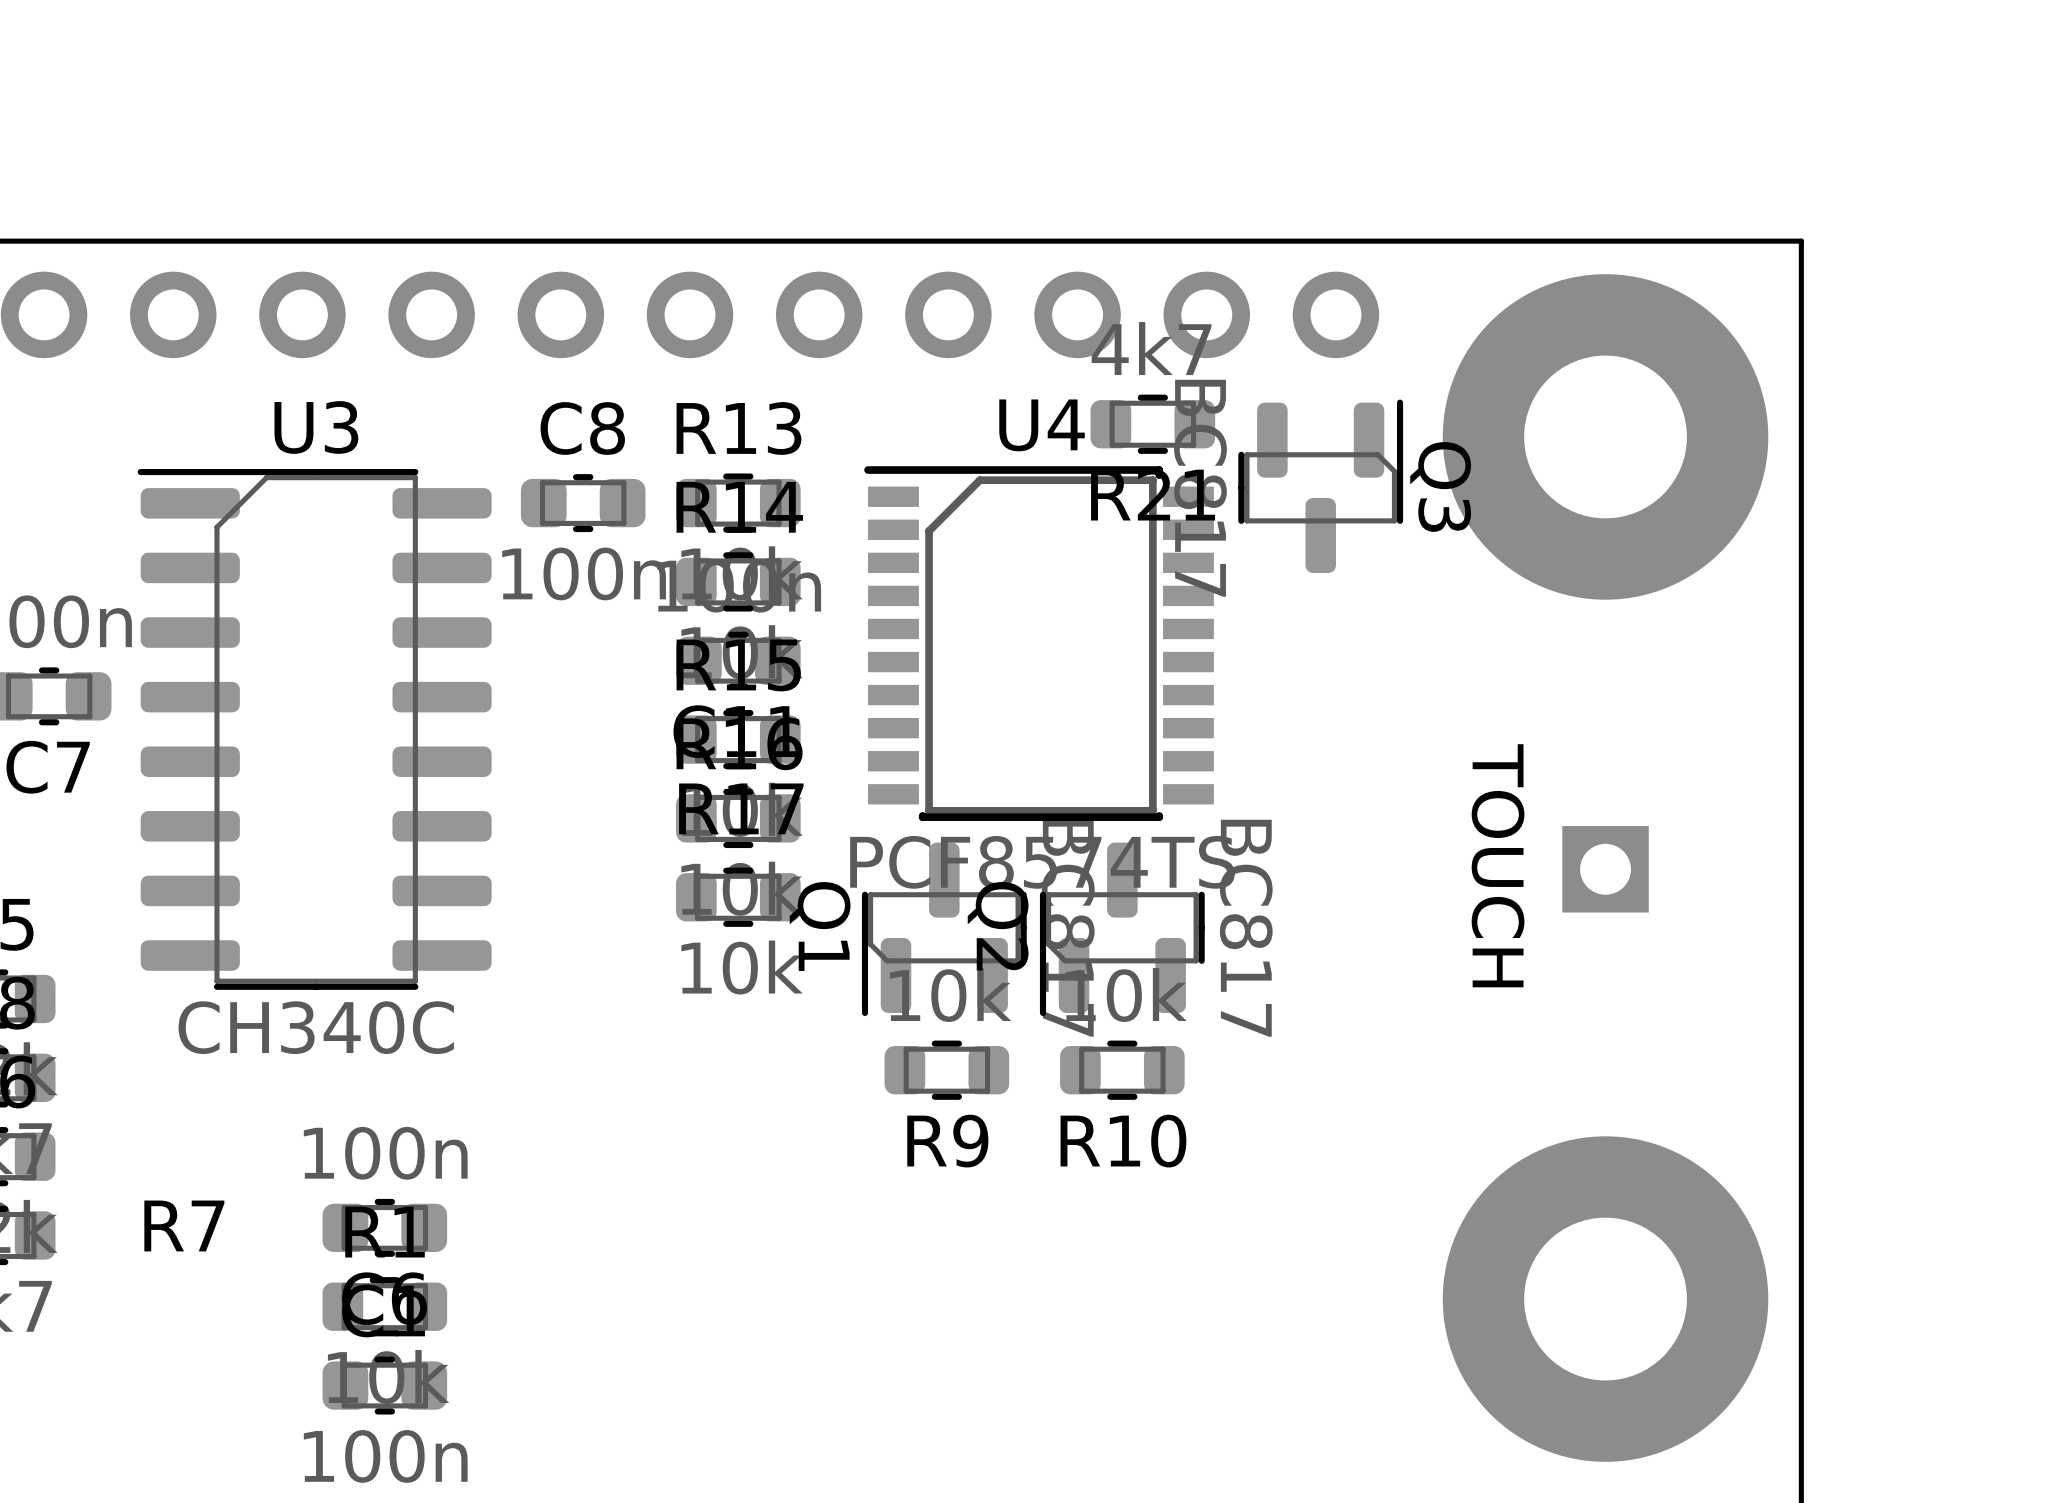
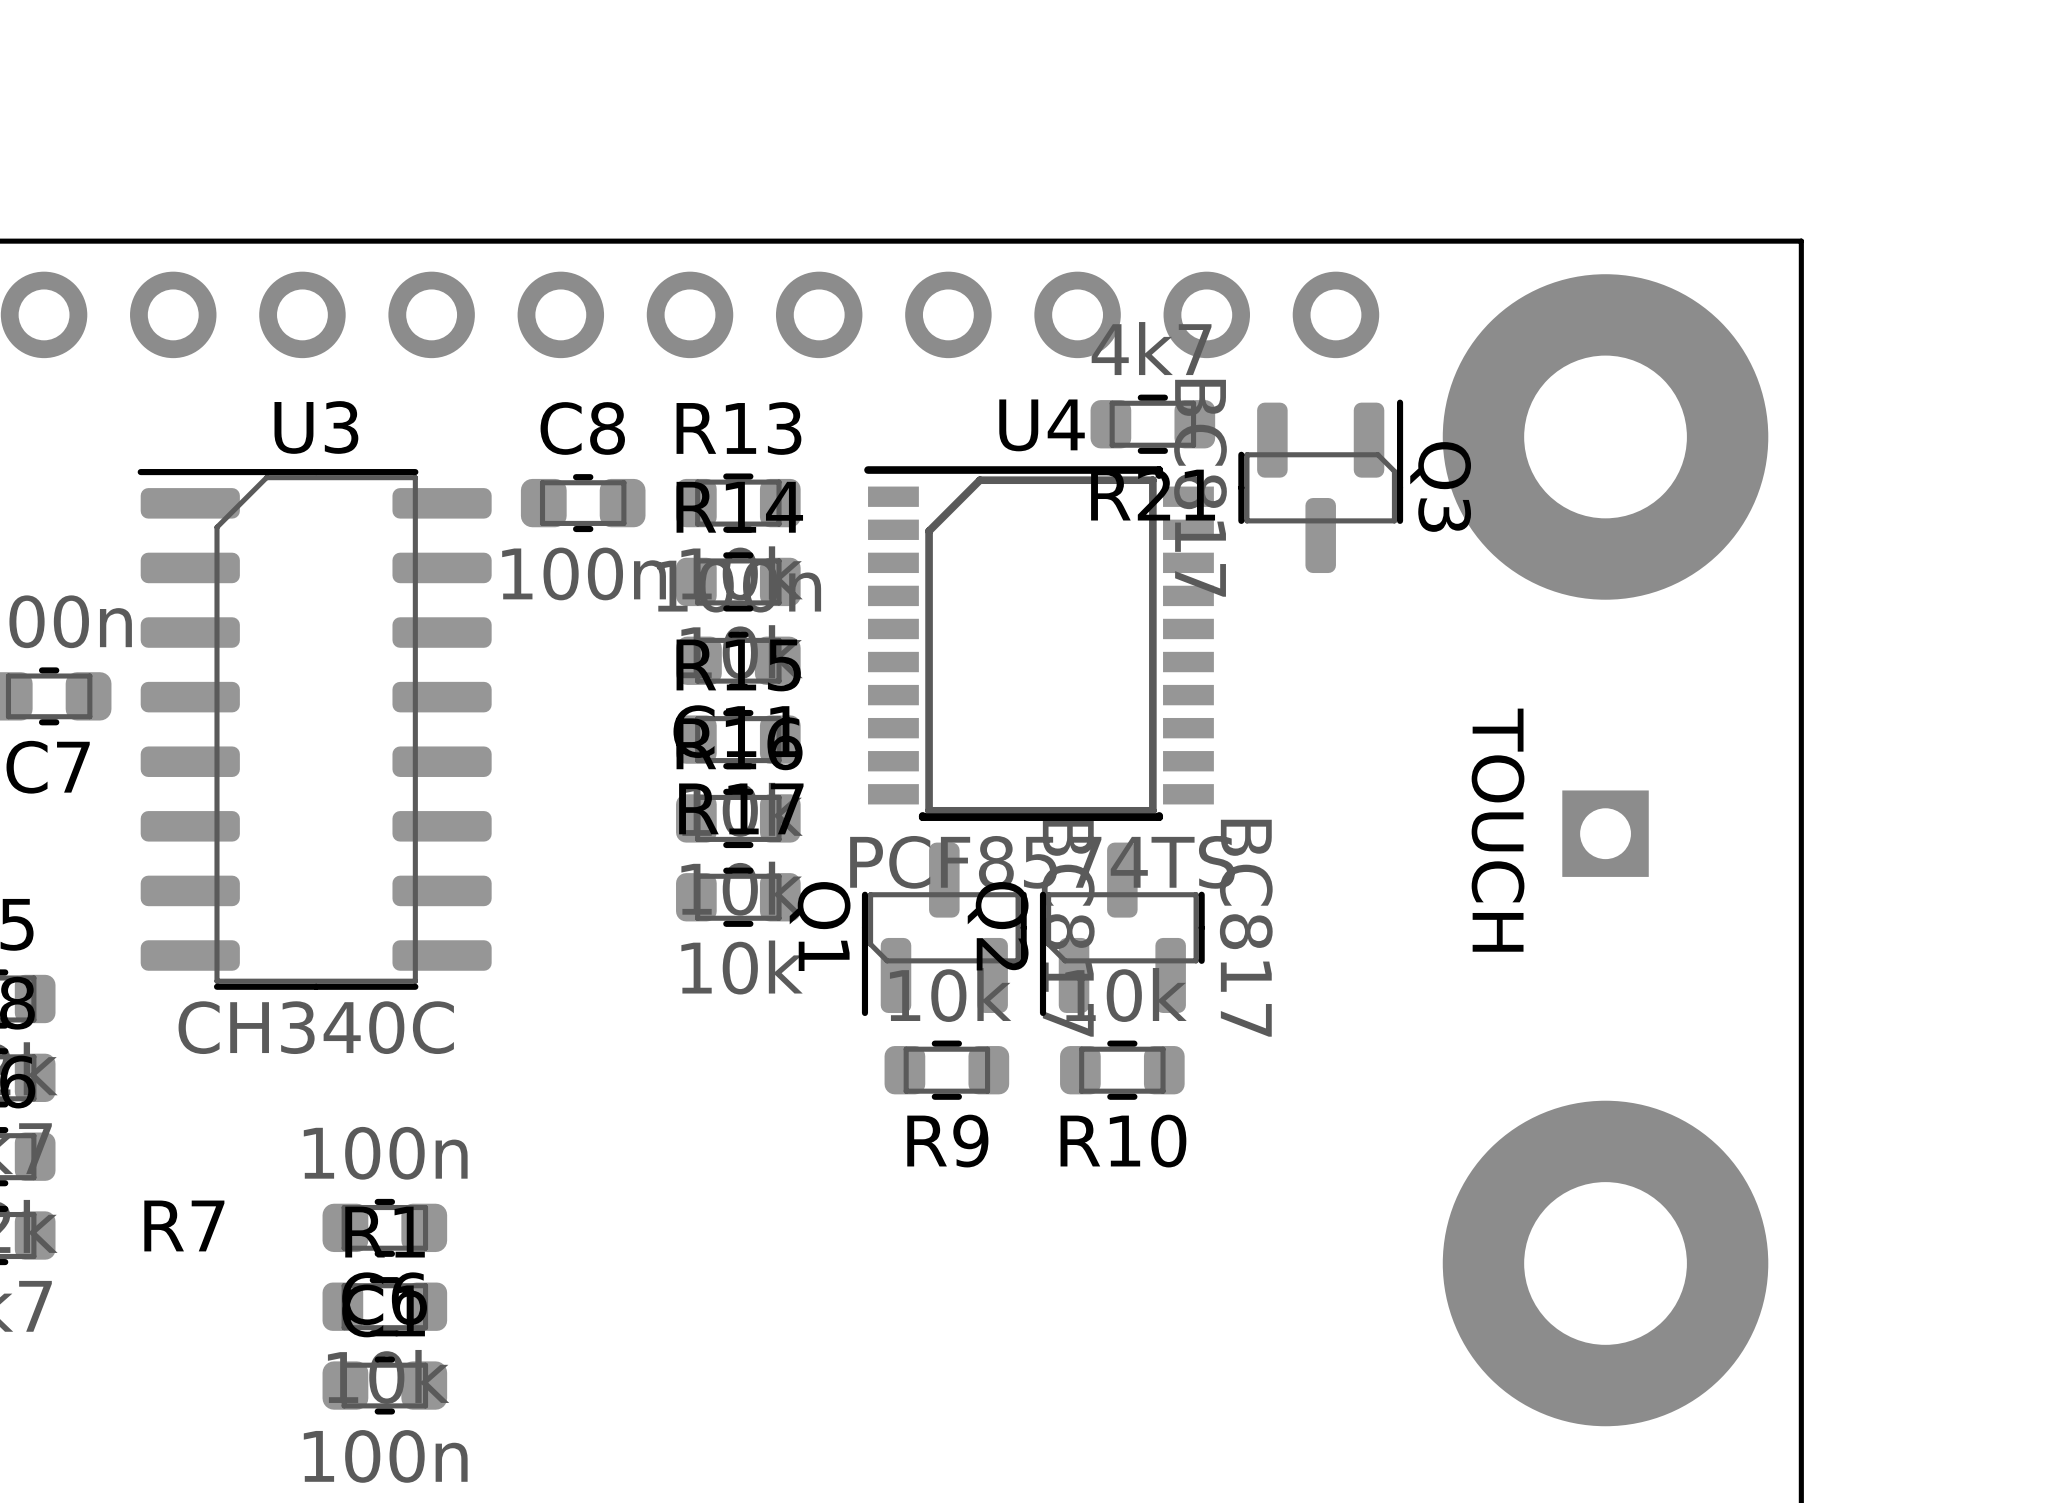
text position: TOUCH (1498, 865) -> TOUCH (1498, 830)
part position: (1605, 869) -> (1605, 833)
part position: (1605, 1299) -> (1605, 1263)

